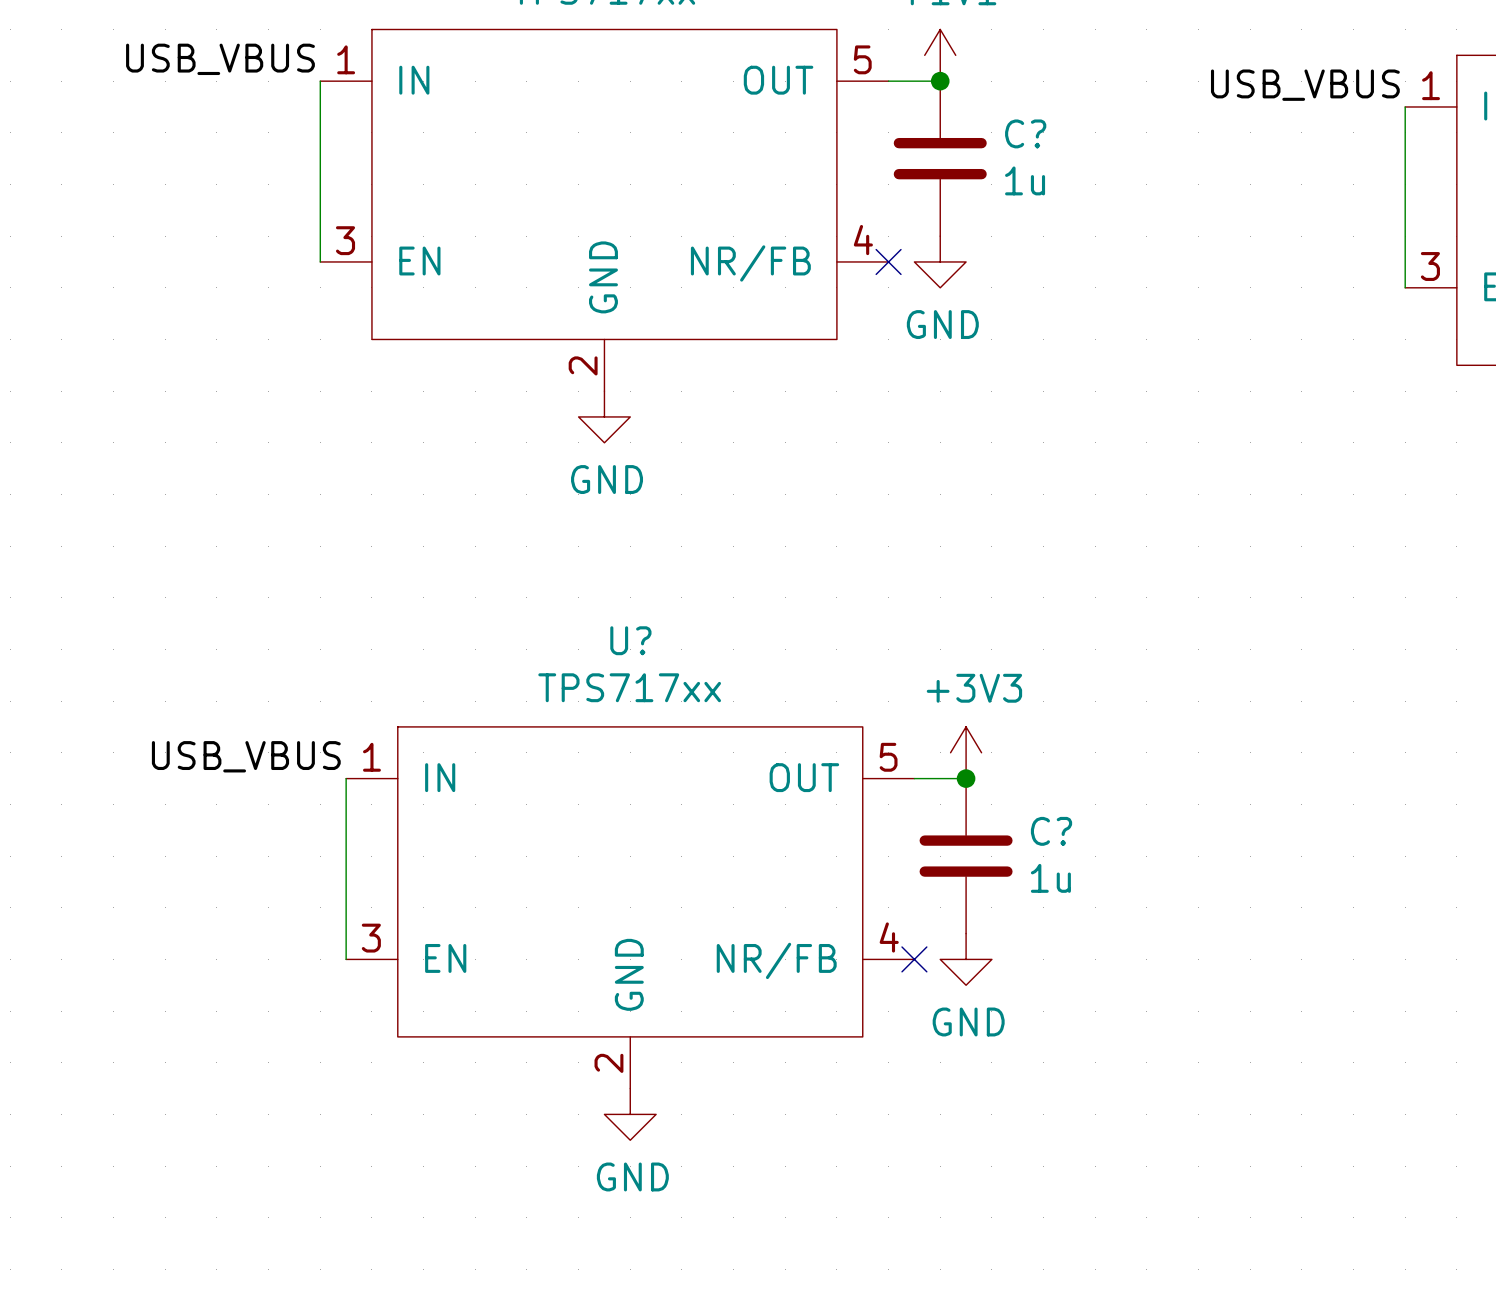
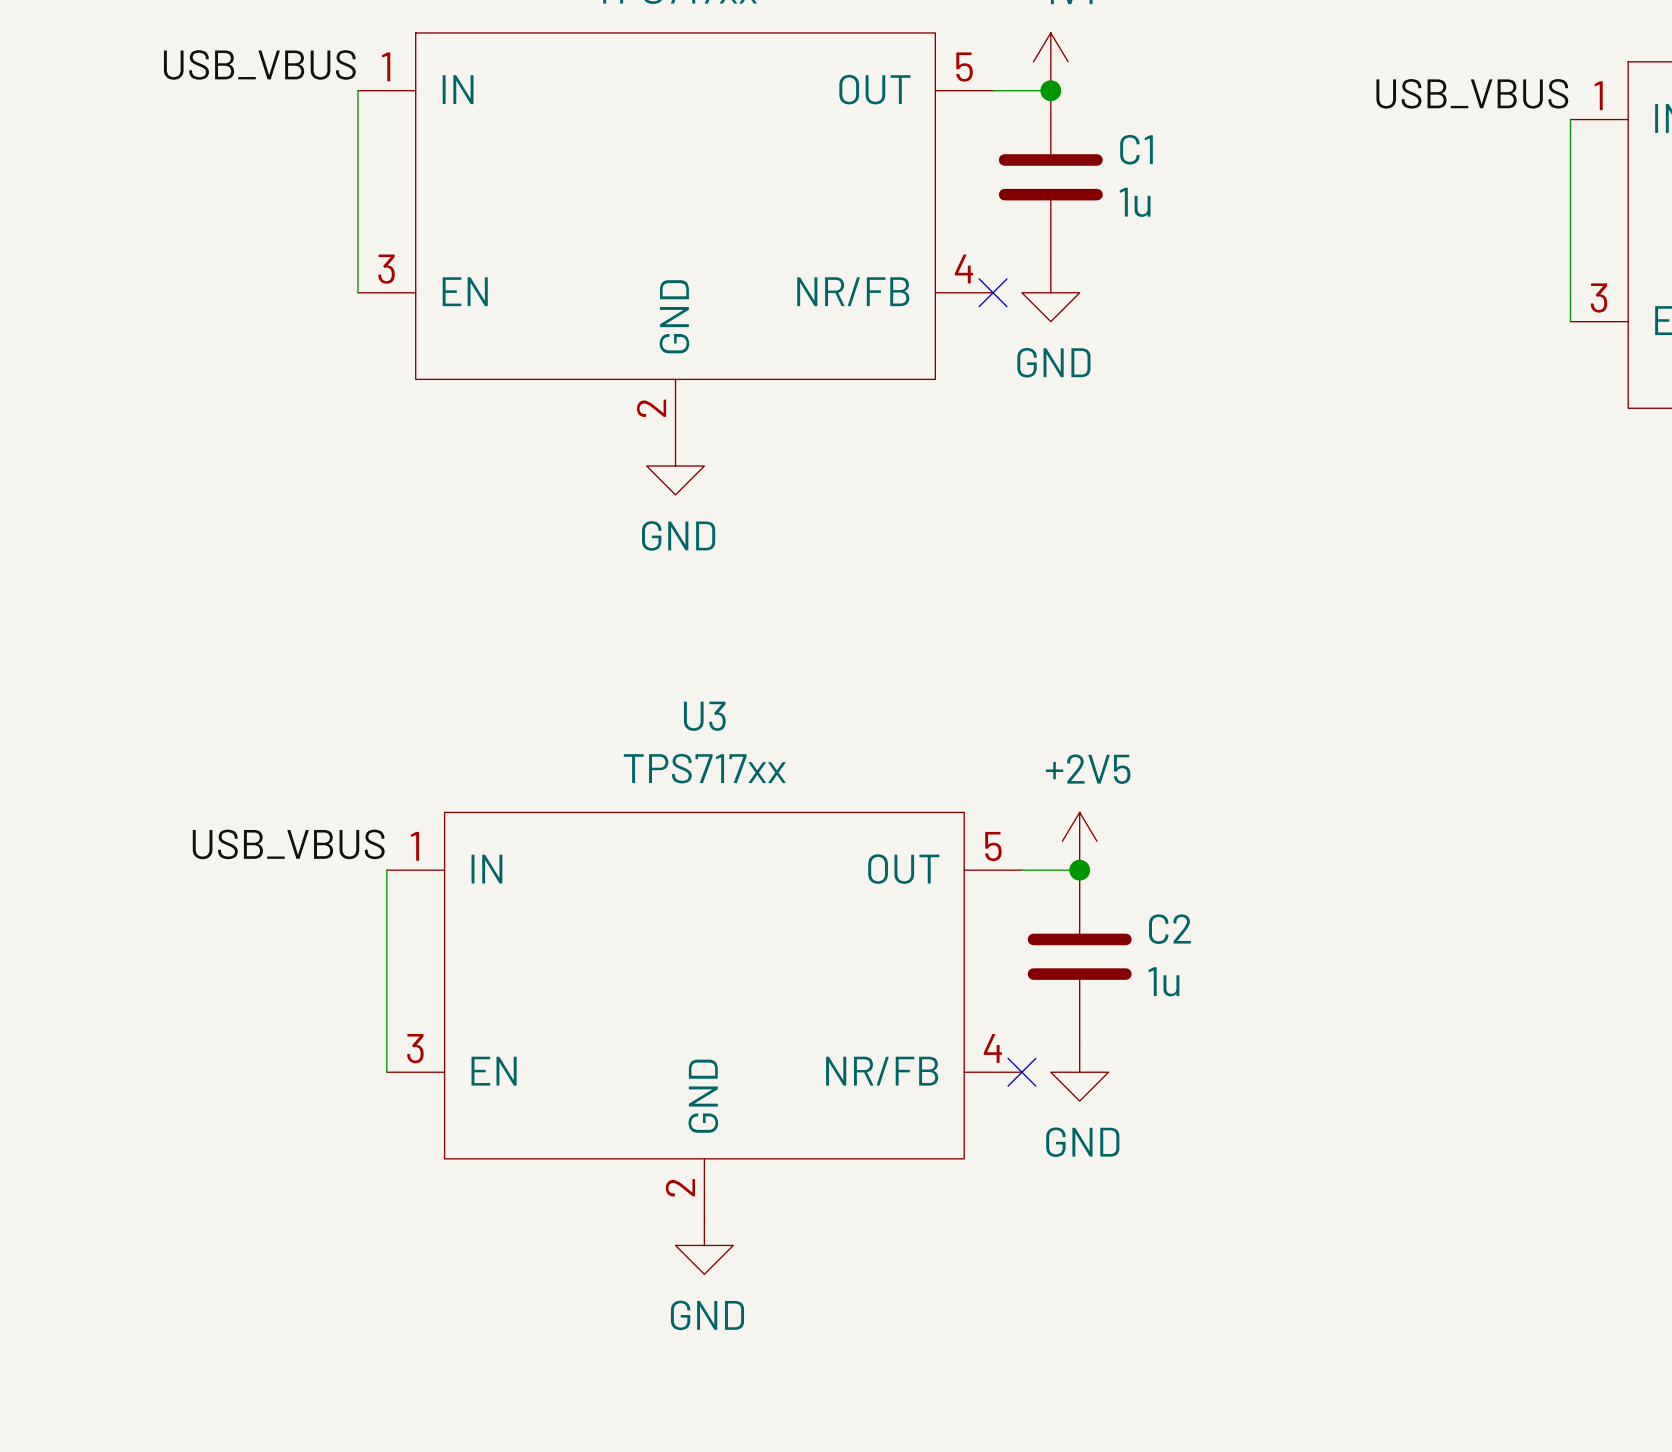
C? name: C? (1025, 133) -> C1 (1136, 149)
U? name: U? (630, 640) -> U3 (704, 716)
power symbol: +3V3 (966, 752) -> +2V5 (1079, 841)
C? name: C? (1051, 831) -> C2 (1169, 929)

